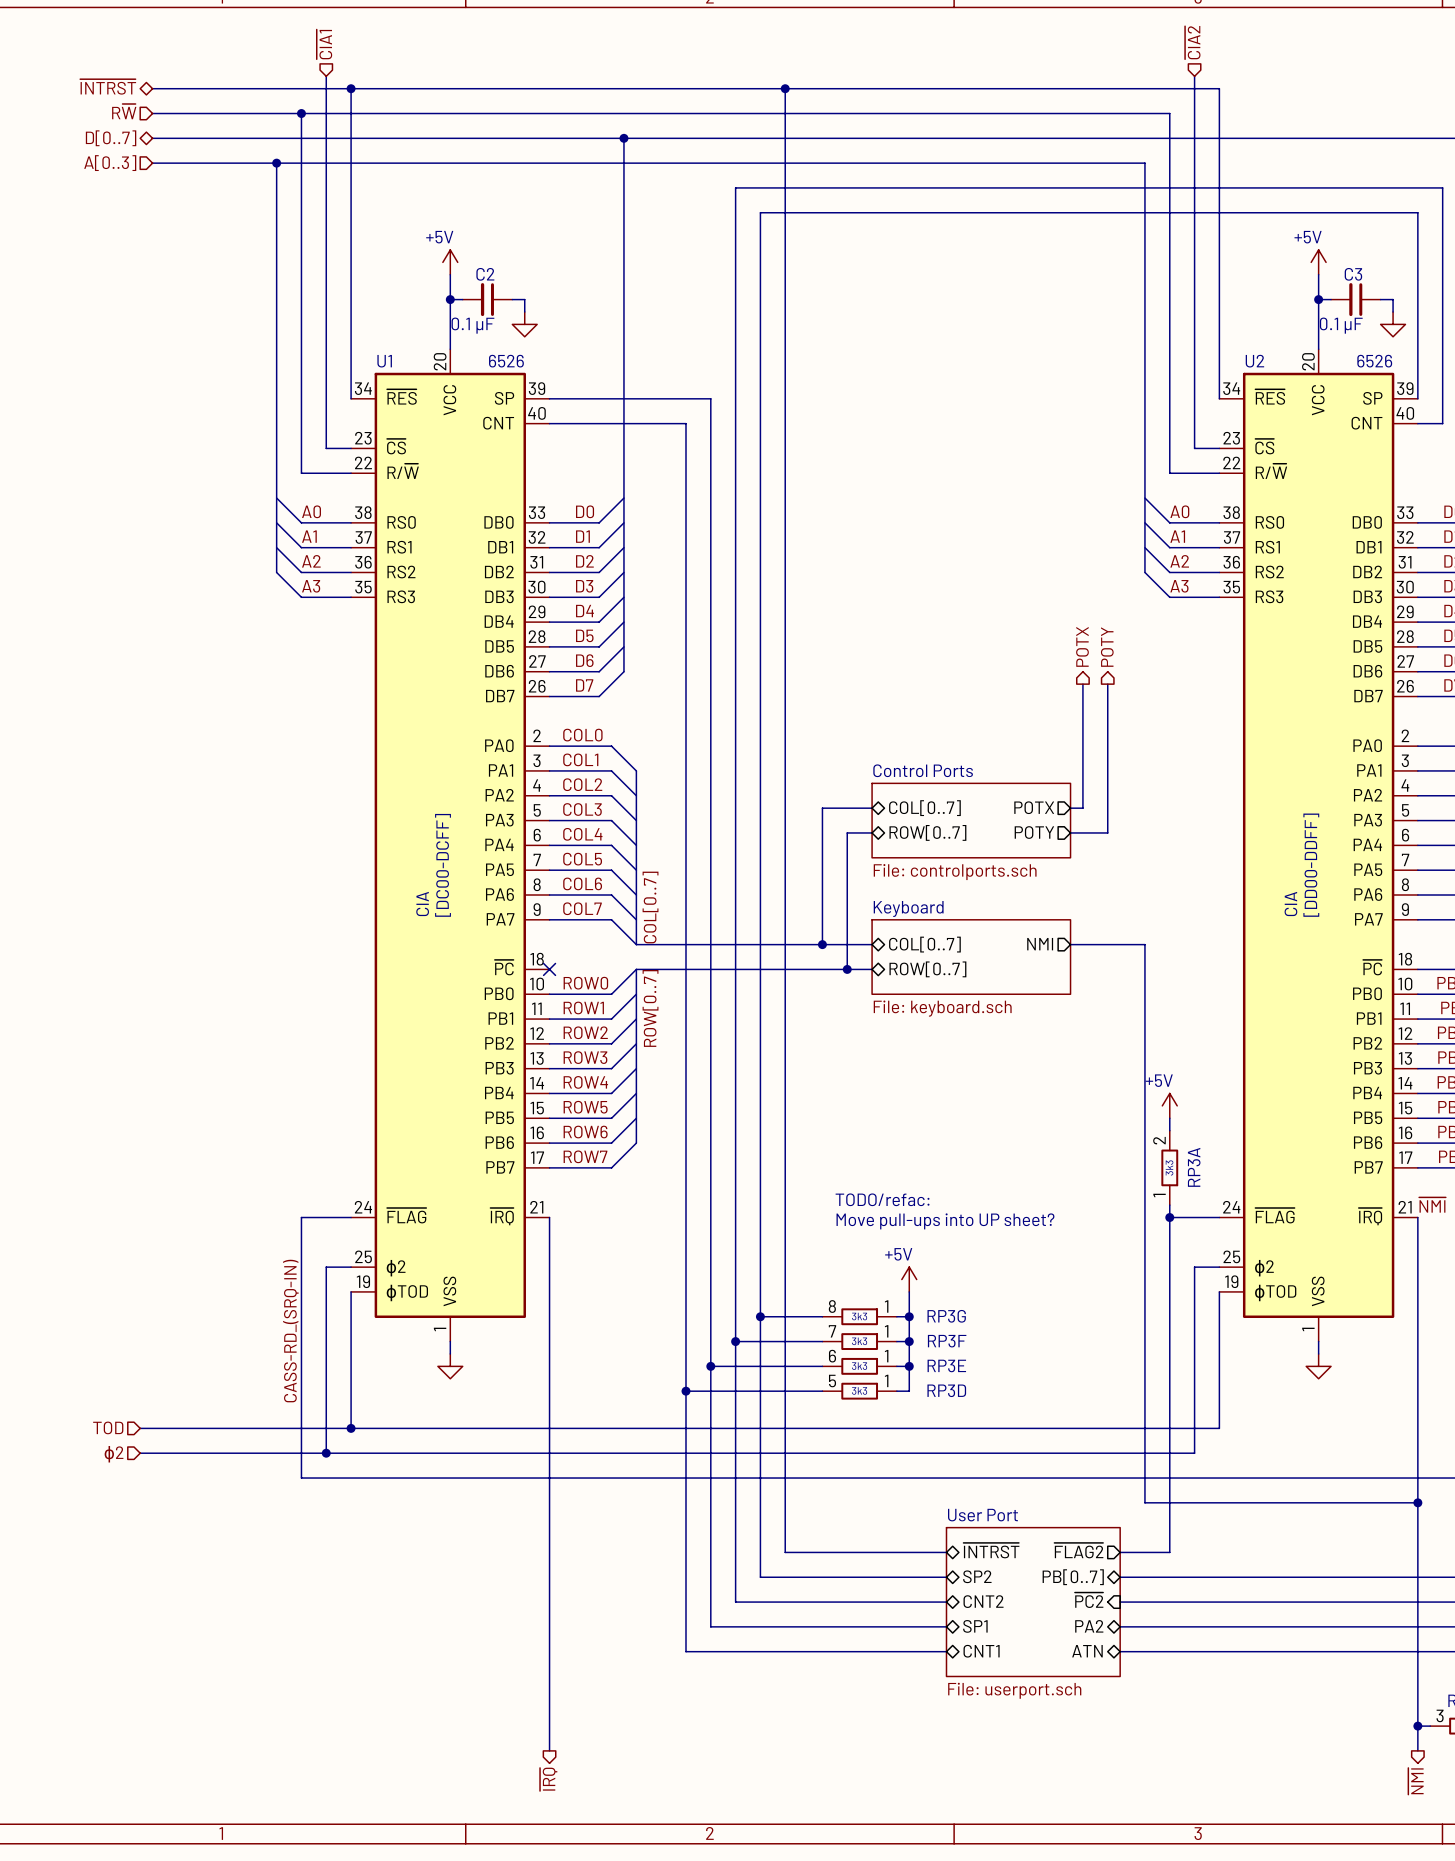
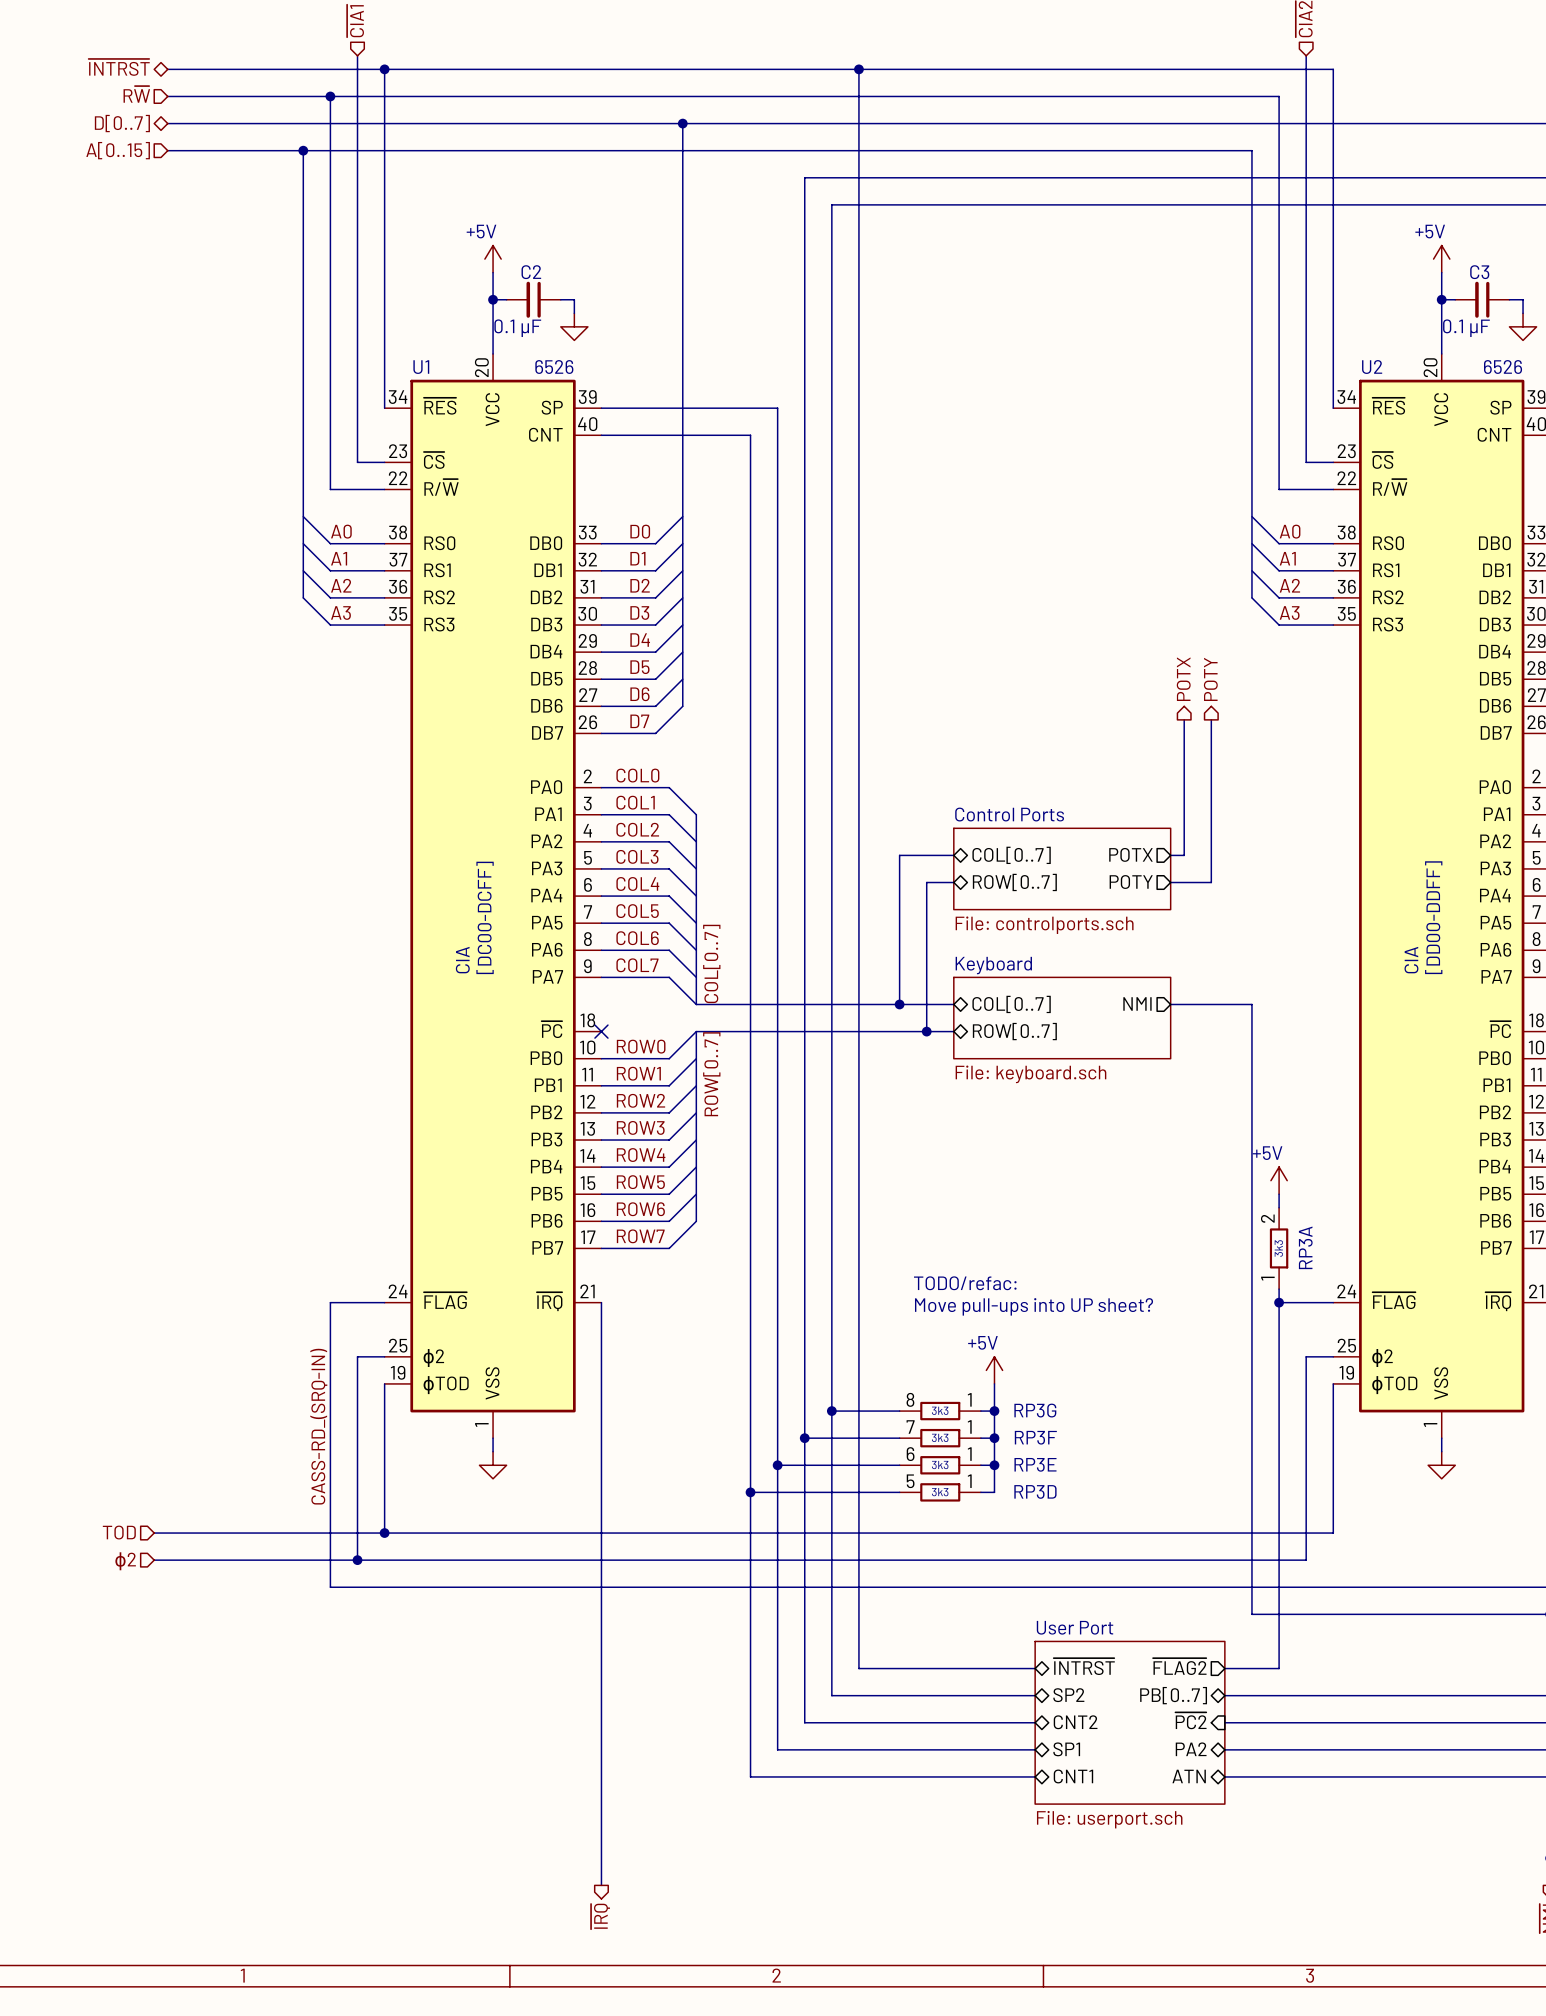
hierarchical label: A[0..3] (110, 163) -> A[0..15] (118, 150)

